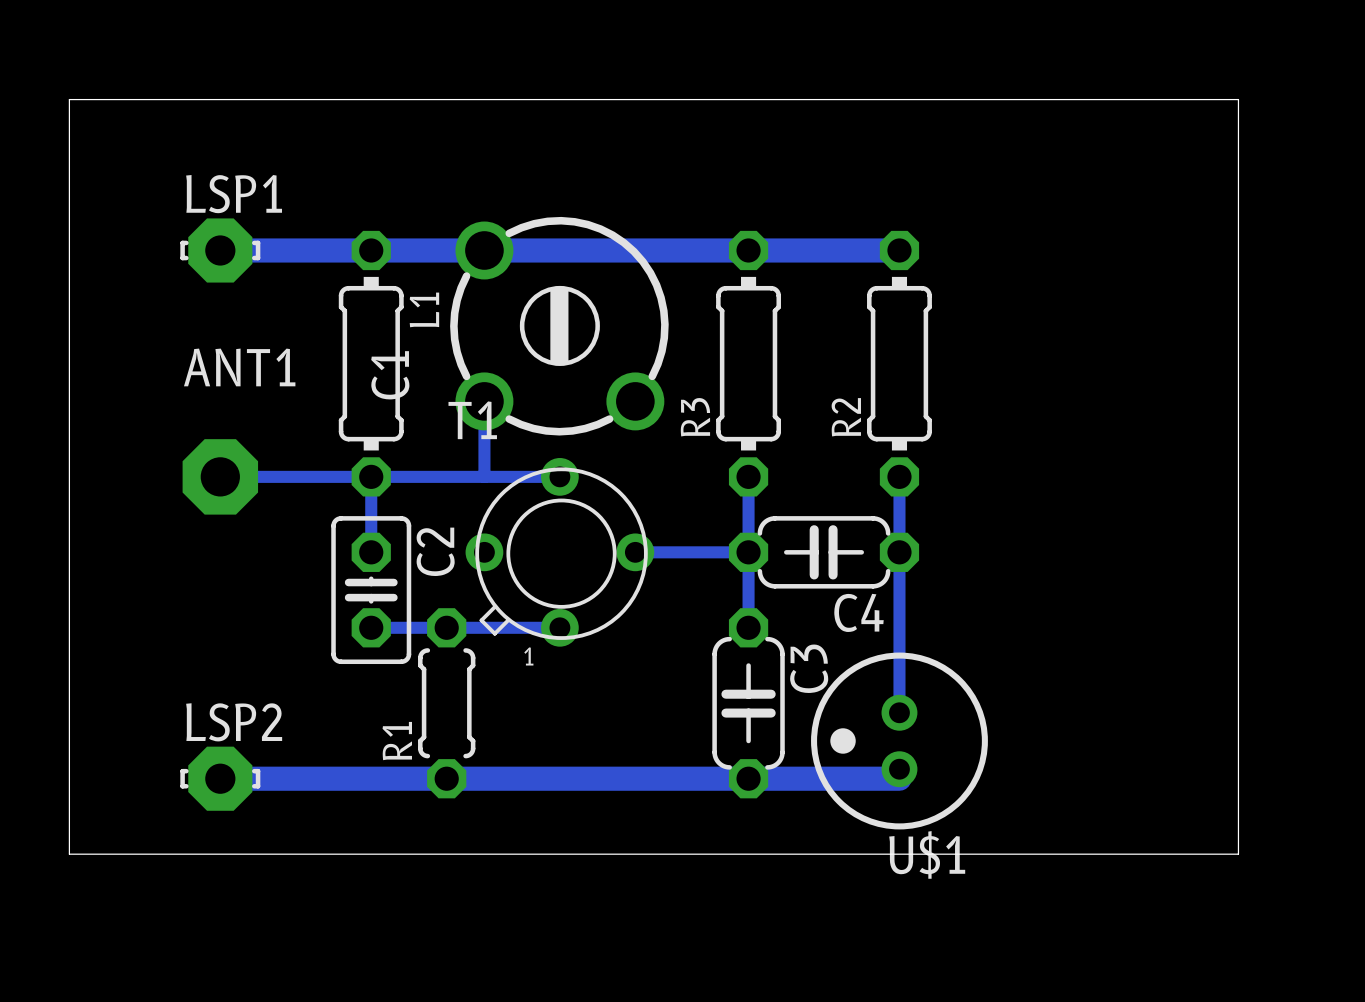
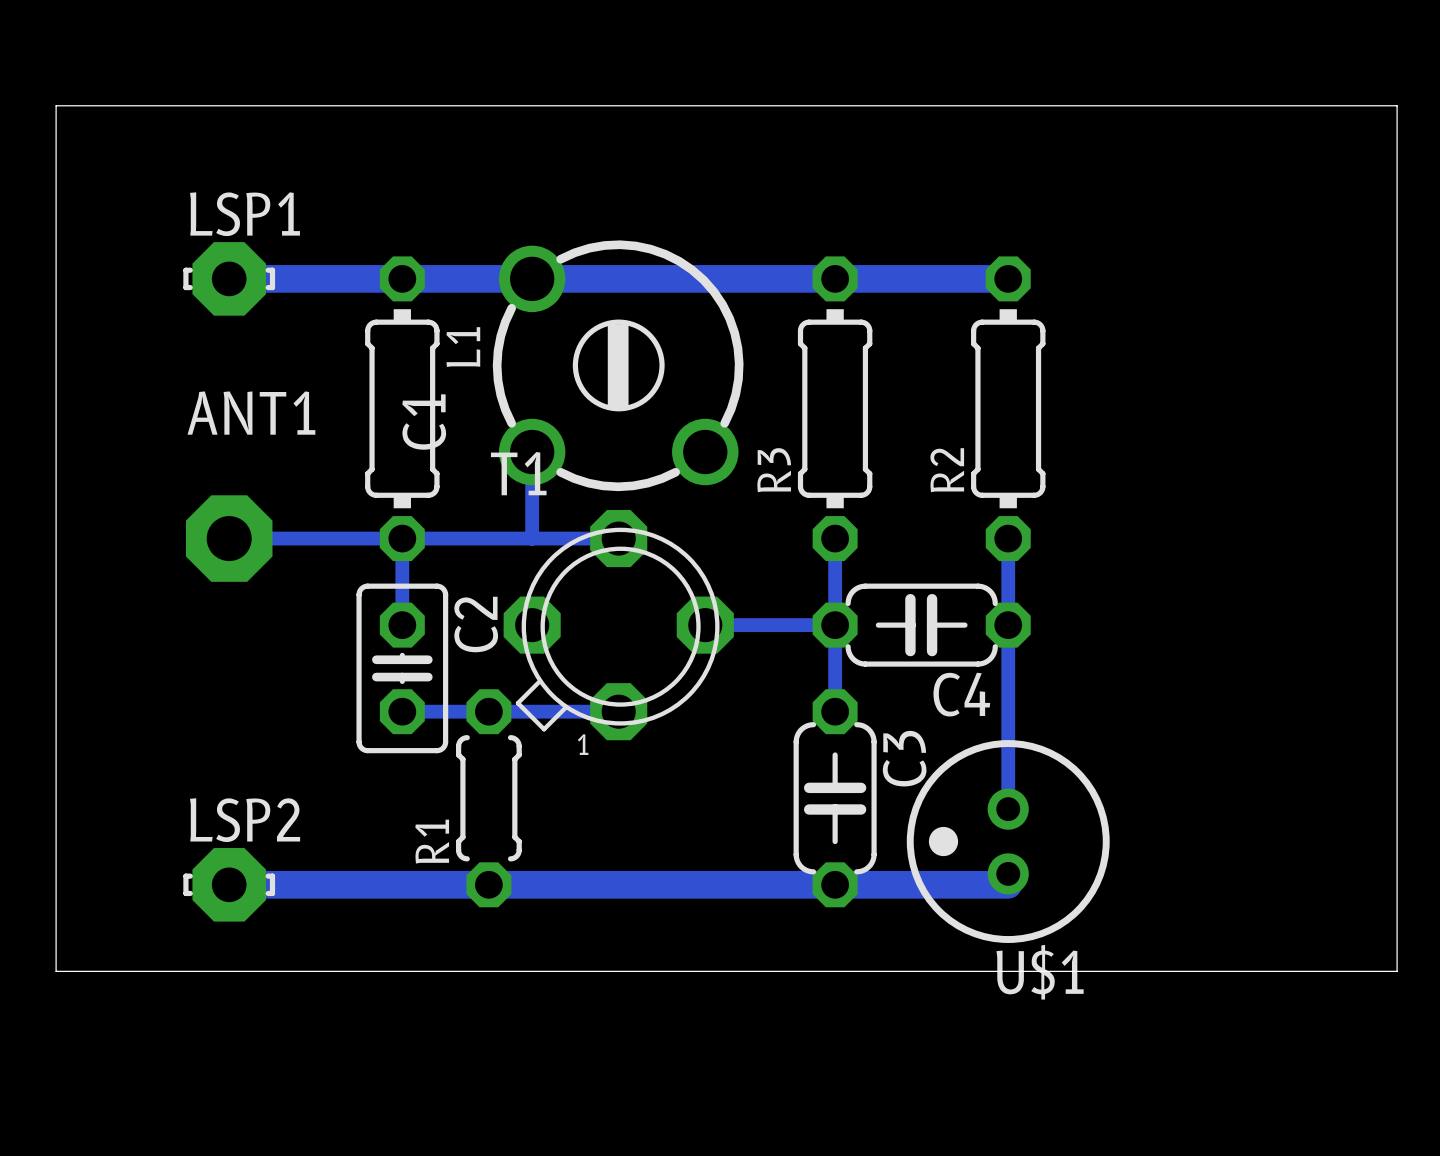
T1 footprint: [465, 458, 655, 647] -> [503, 510, 734, 741]

